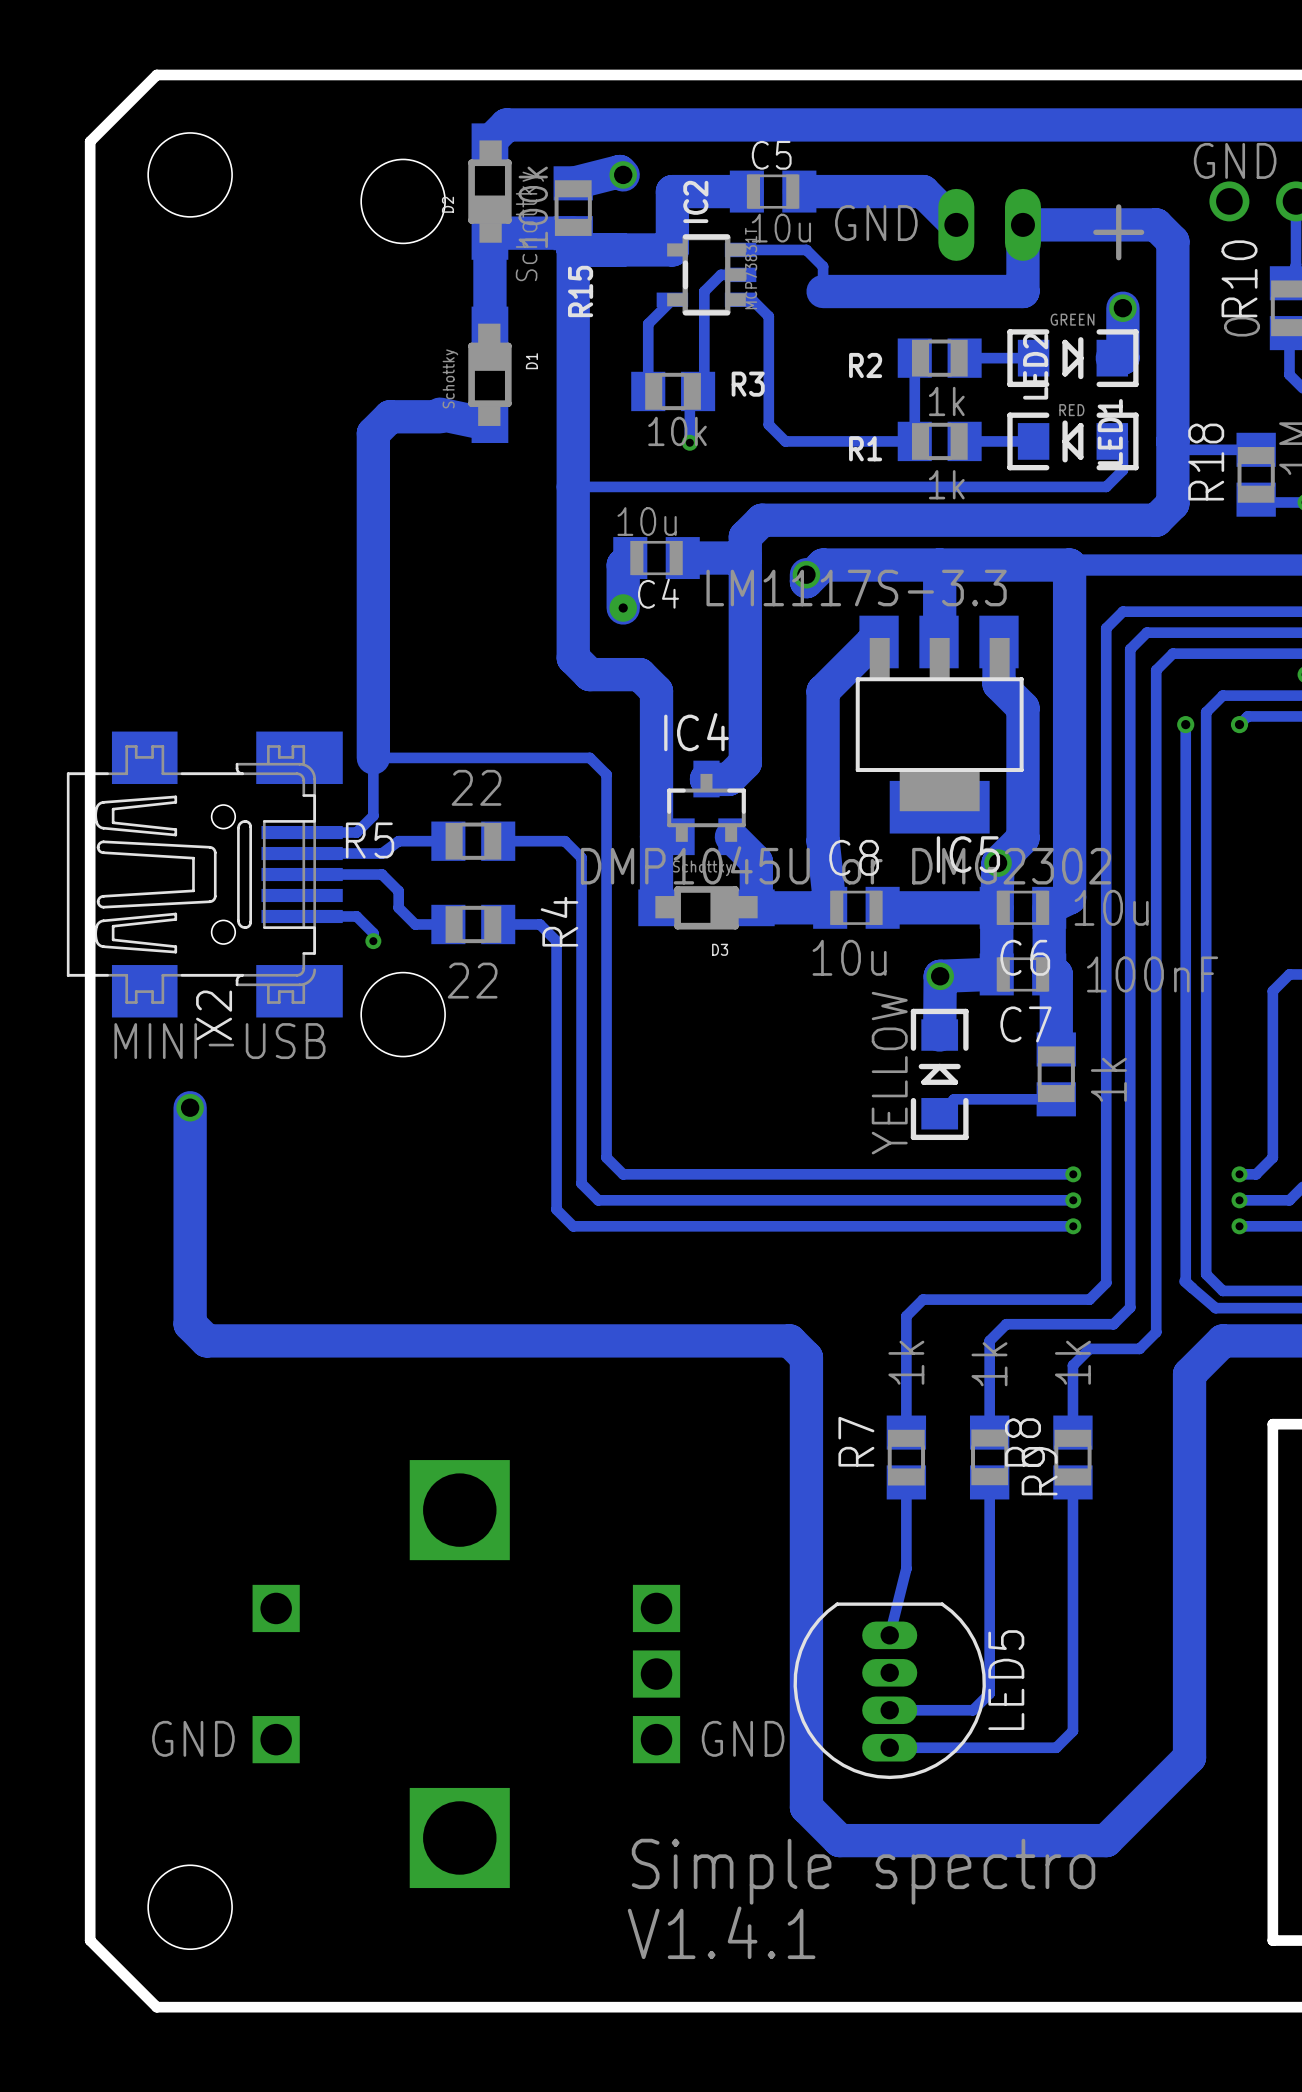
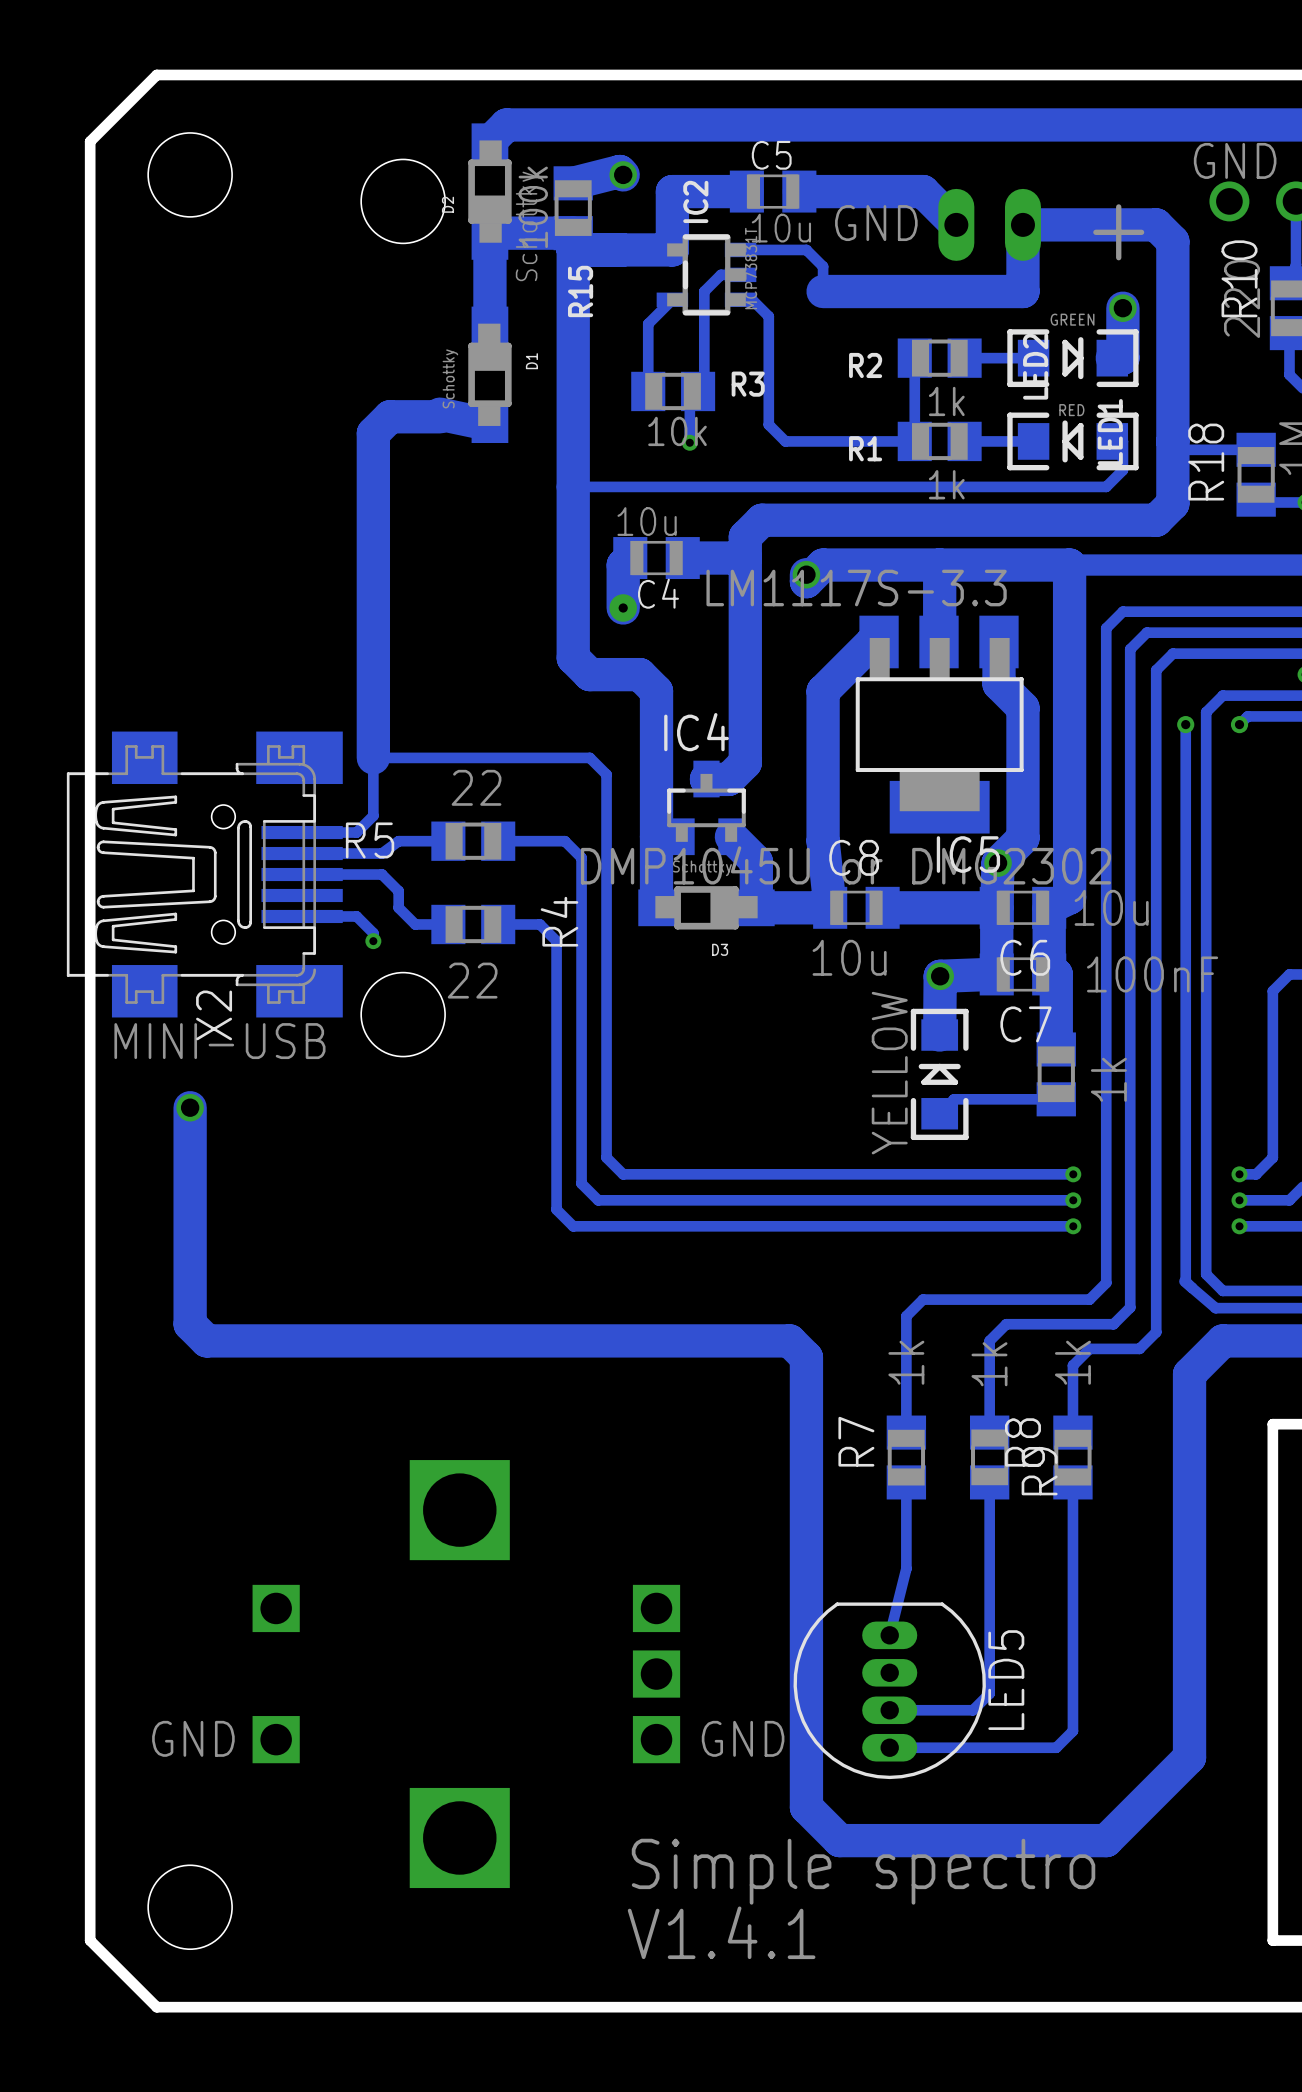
R10 value: 0 (1242, 326) -> 220 (1242, 298)

